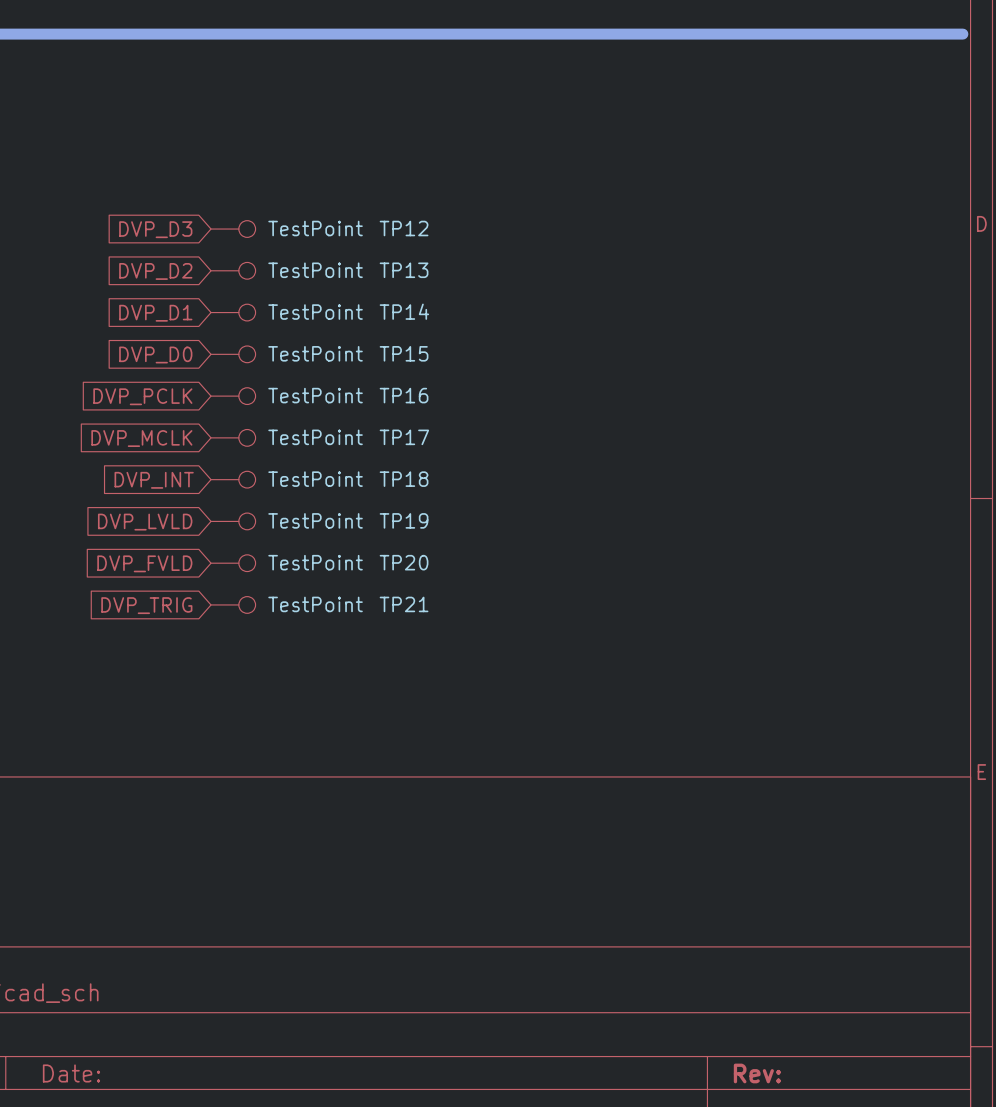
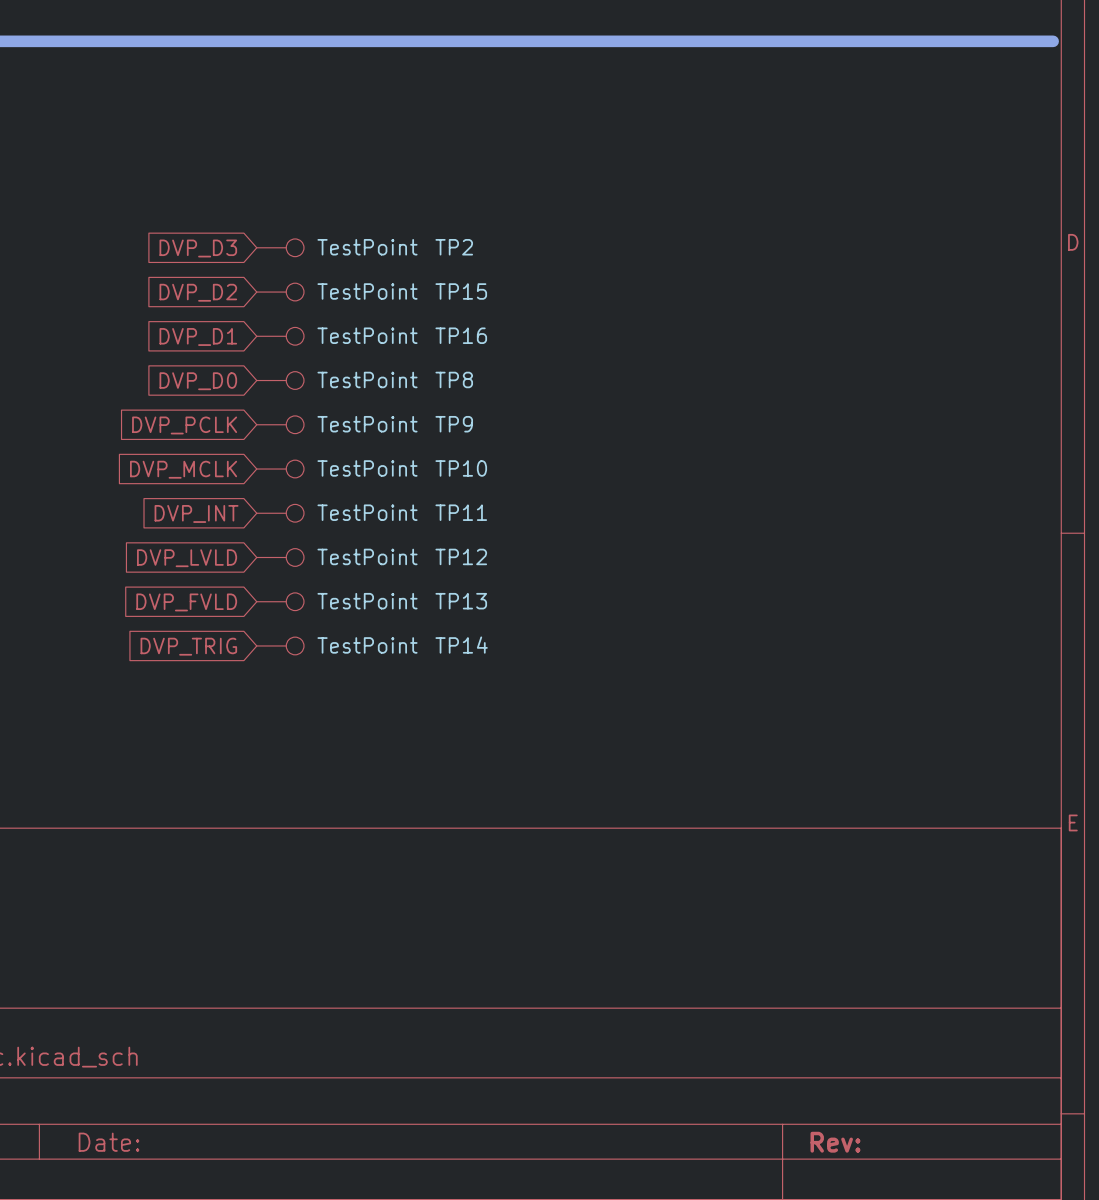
TP12 name: TP12 (404, 228) -> TP2 (454, 247)
TP13 name: TP13 (404, 270) -> TP15 (461, 291)
TP14 name: TP14 (404, 311) -> TP16 (461, 335)
TP15 name: TP15 (404, 353) -> TP8 (454, 379)
TP16 name: TP16 (404, 395) -> TP9 (454, 424)
TP17 name: TP17 (404, 437) -> TP10 (461, 468)
TP18 name: TP18 (404, 479) -> TP11 (461, 512)
TP19 name: TP19 (404, 520) -> TP12 (461, 556)
TP20 name: TP20 (404, 562) -> TP13 (461, 601)
TP21 name: TP21 (404, 604) -> TP14 (461, 645)

